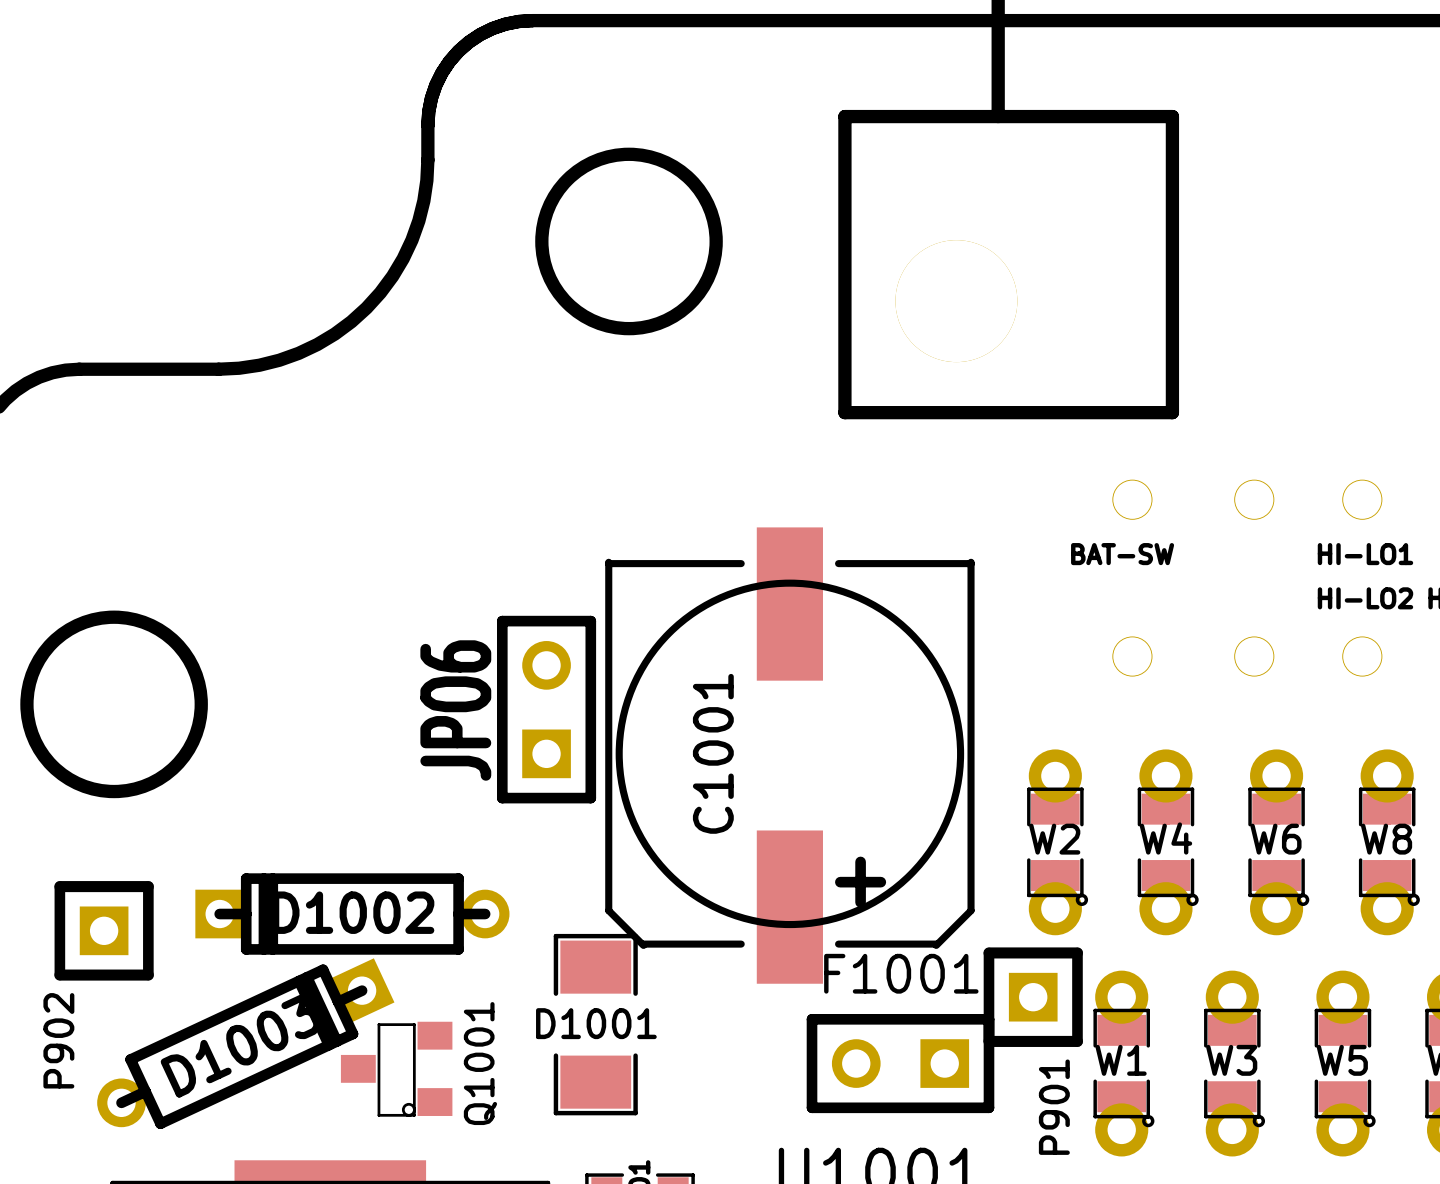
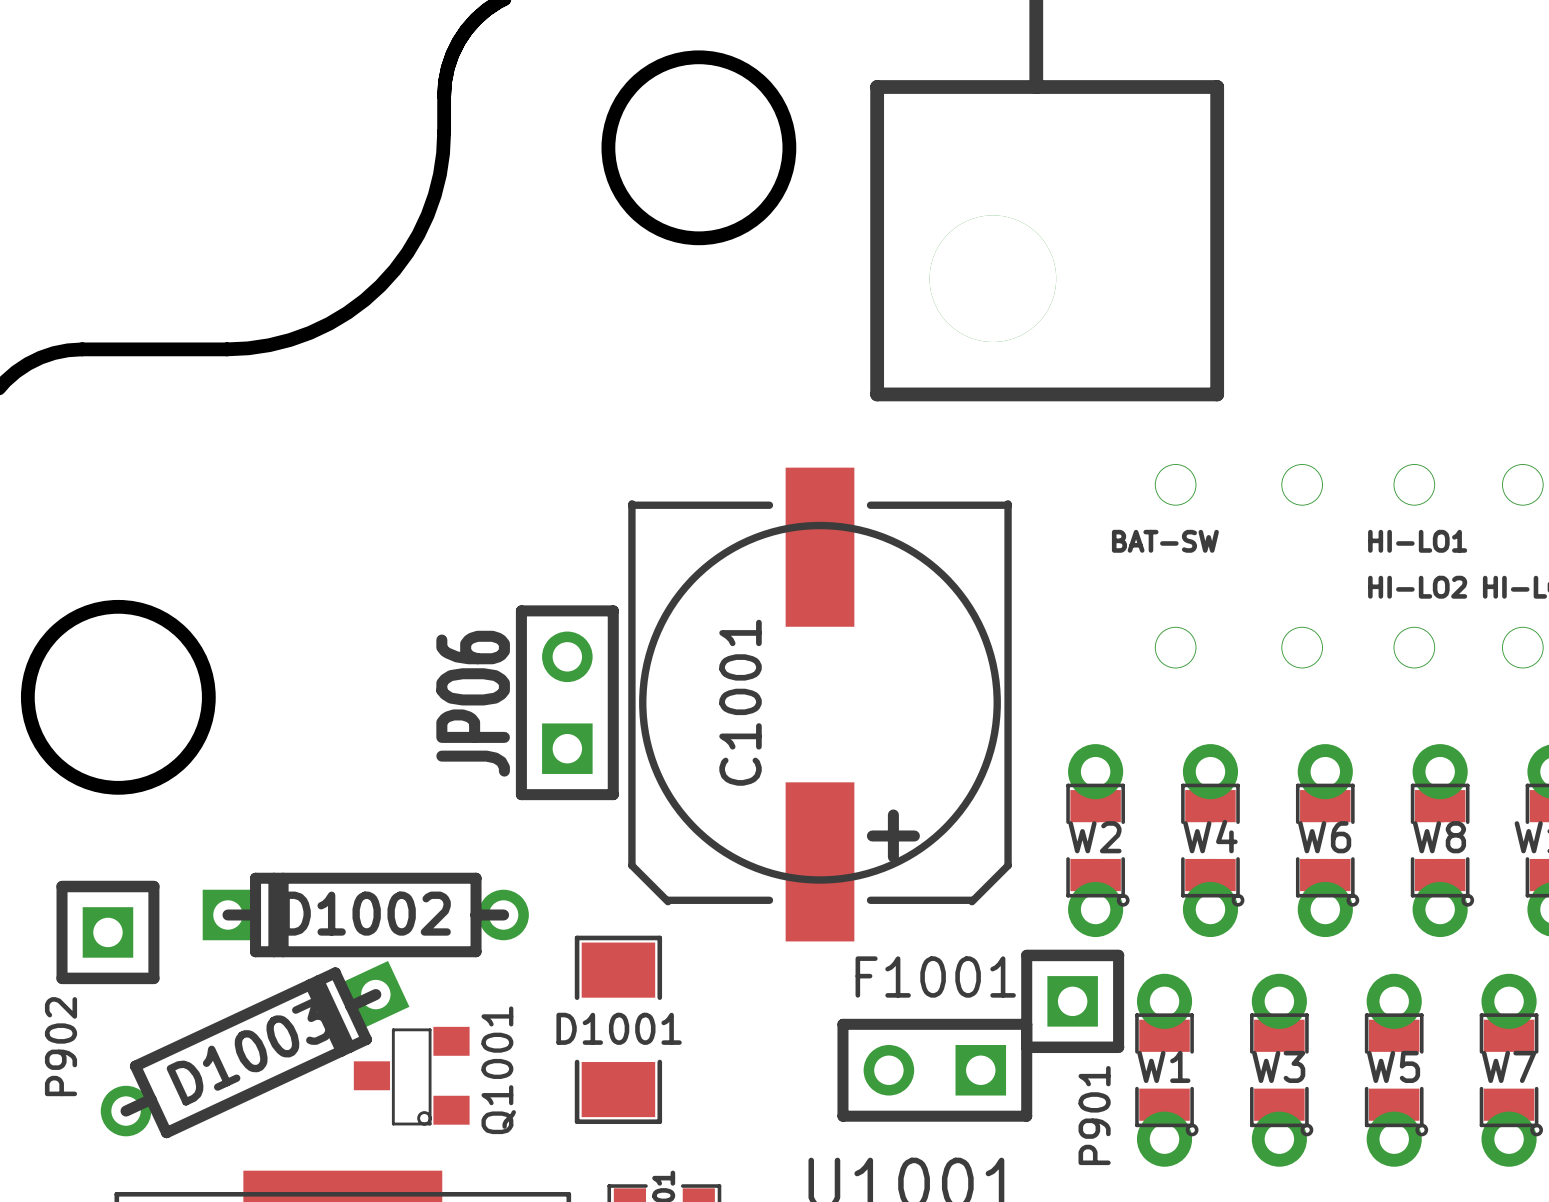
round board edge position: (629, 241) -> (698, 147)
C1001 position: (789, 755) -> (819, 704)

